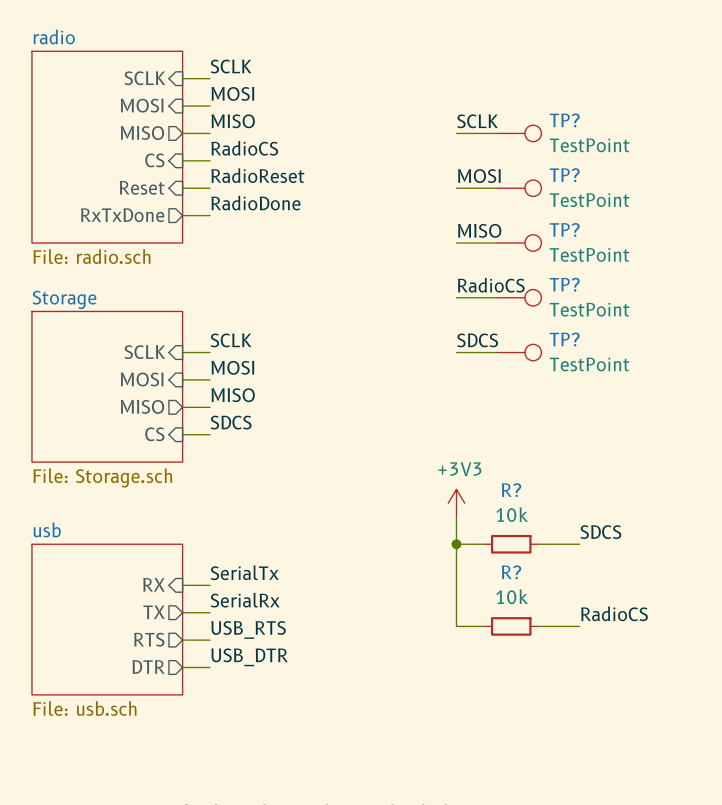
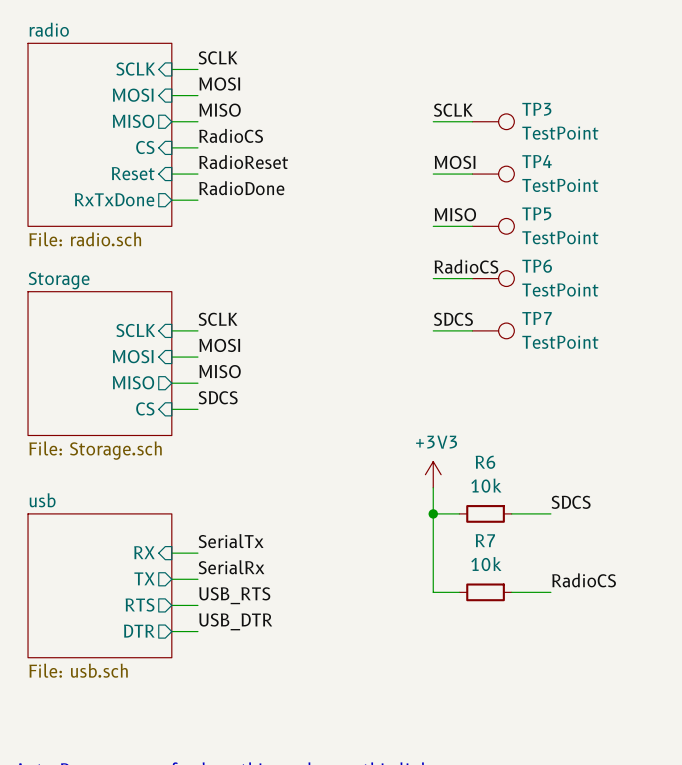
TP? name: TP? (564, 120) -> TP3 (536, 109)
TP? name: TP? (564, 175) -> TP4 (537, 161)
TP? name: TP? (564, 229) -> TP5 (536, 213)
TP? name: TP? (564, 284) -> TP6 (537, 266)
TP? name: TP? (564, 339) -> TP7 (537, 318)
R? name: R? (511, 490) -> R6 (485, 462)
R? name: R? (511, 572) -> R7 (485, 540)

